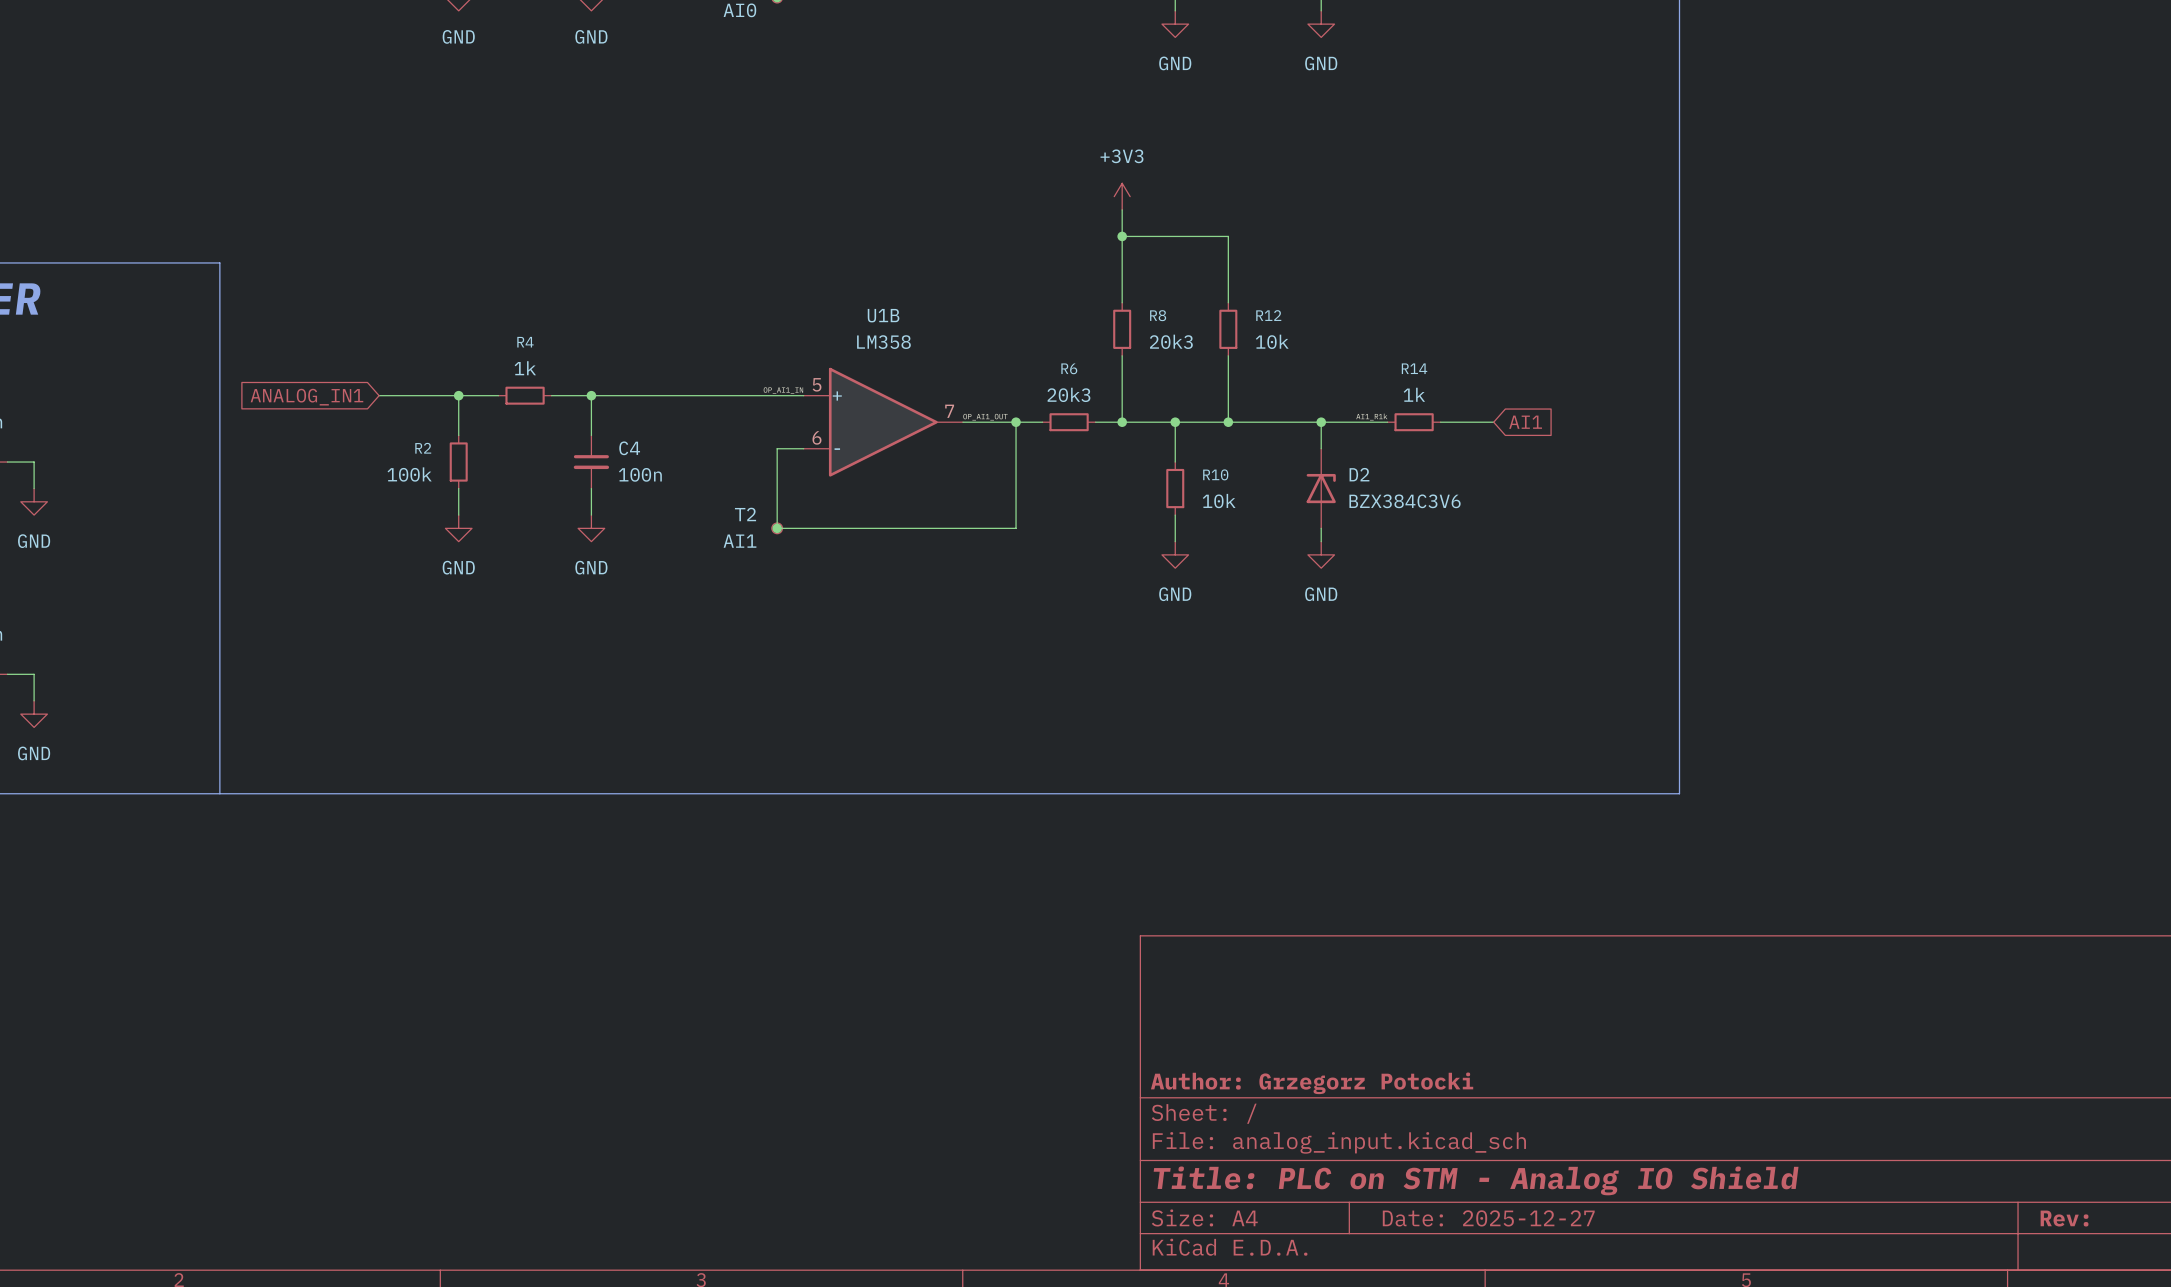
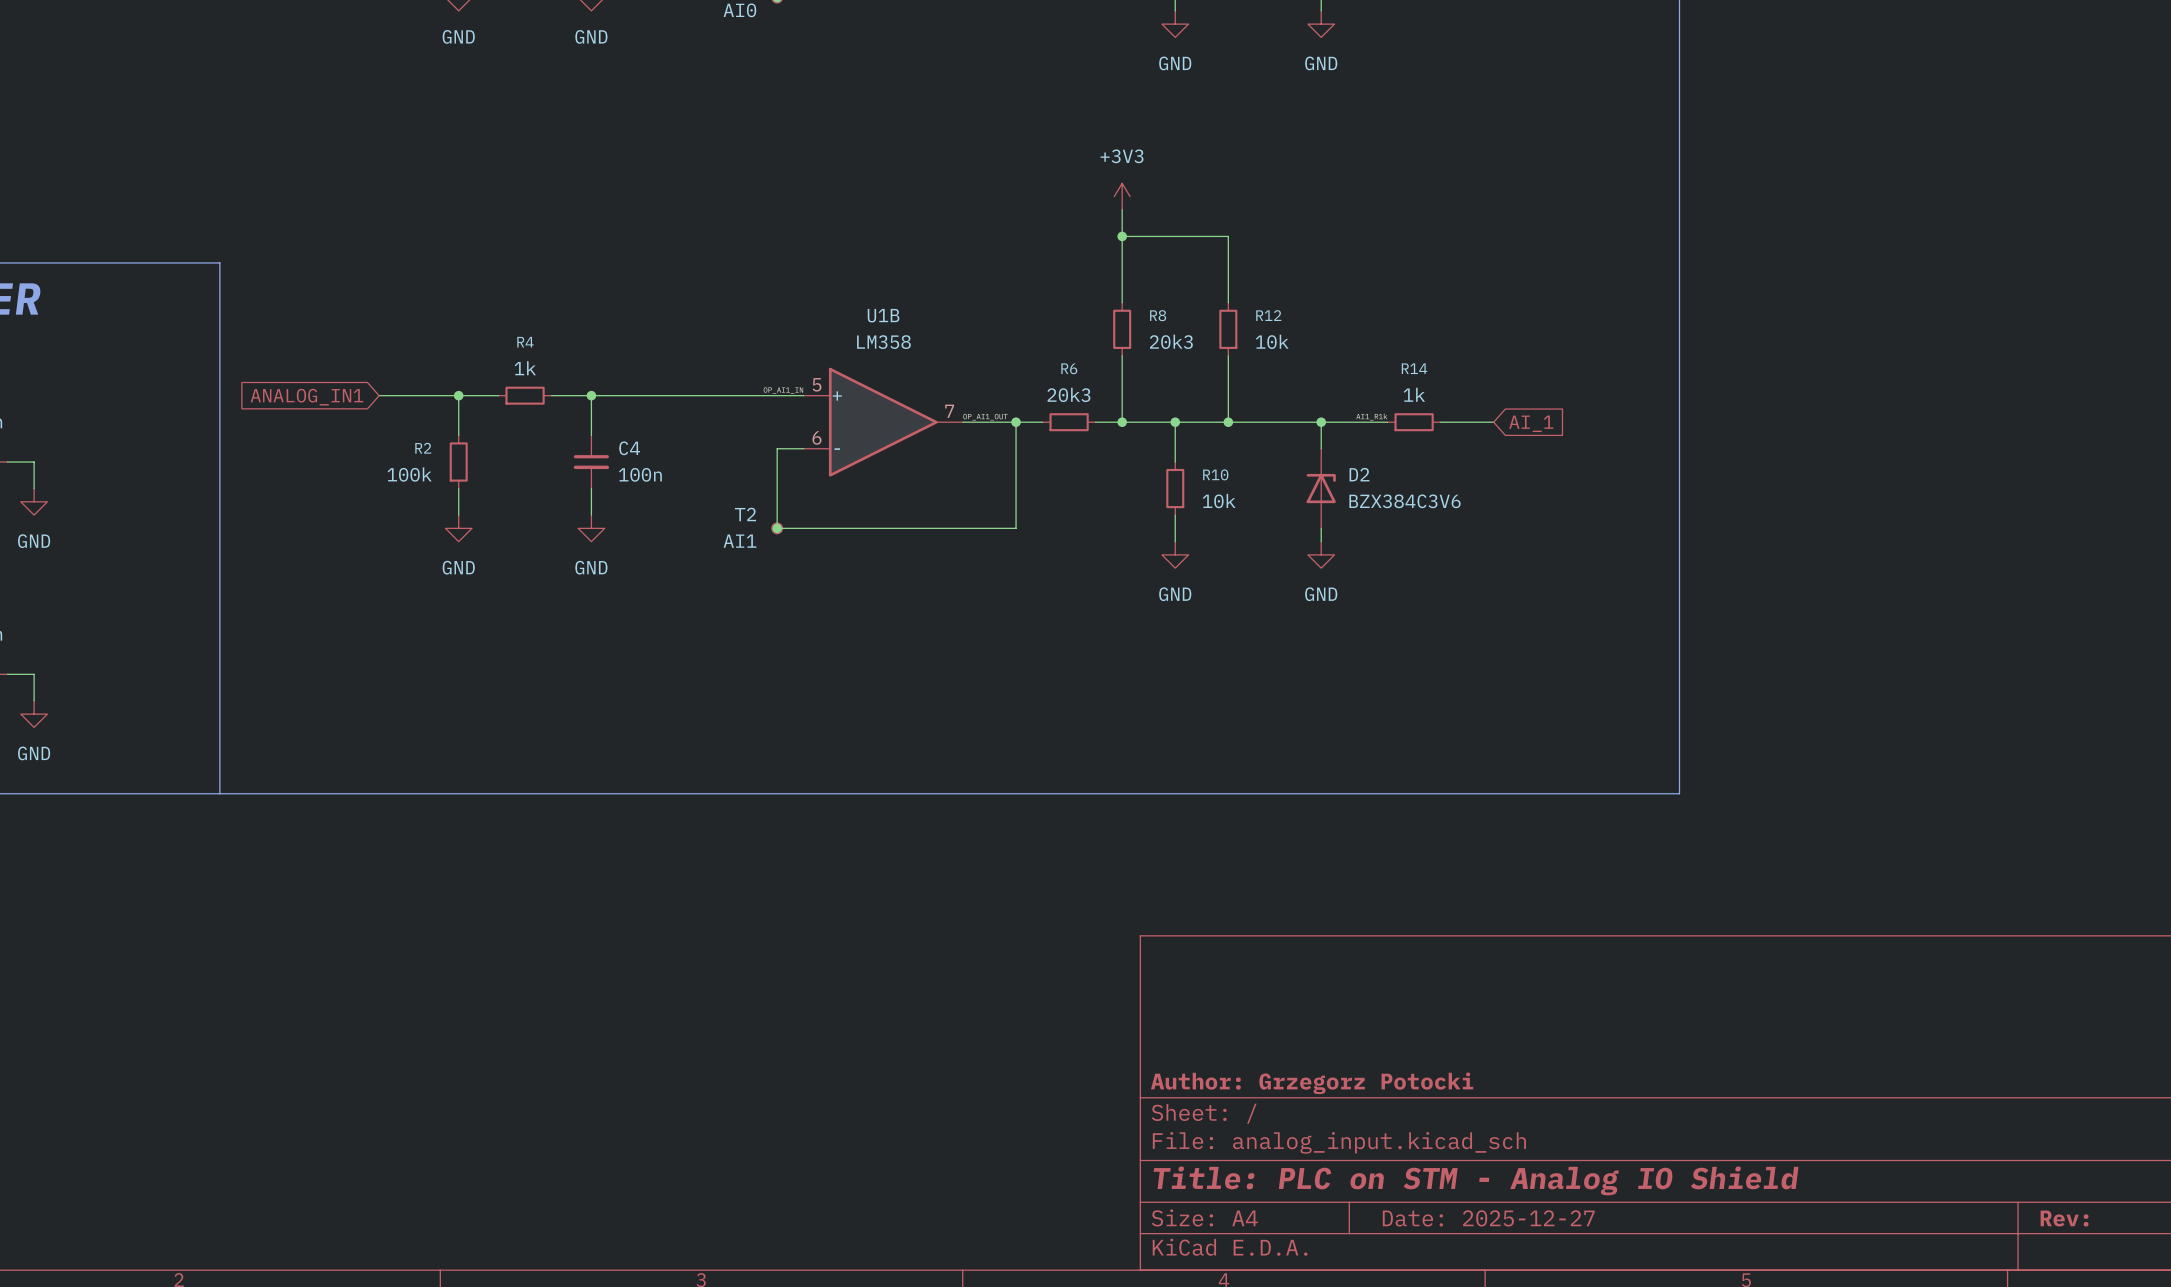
global label: AI1 (1525, 422) -> AI_1 (1531, 423)

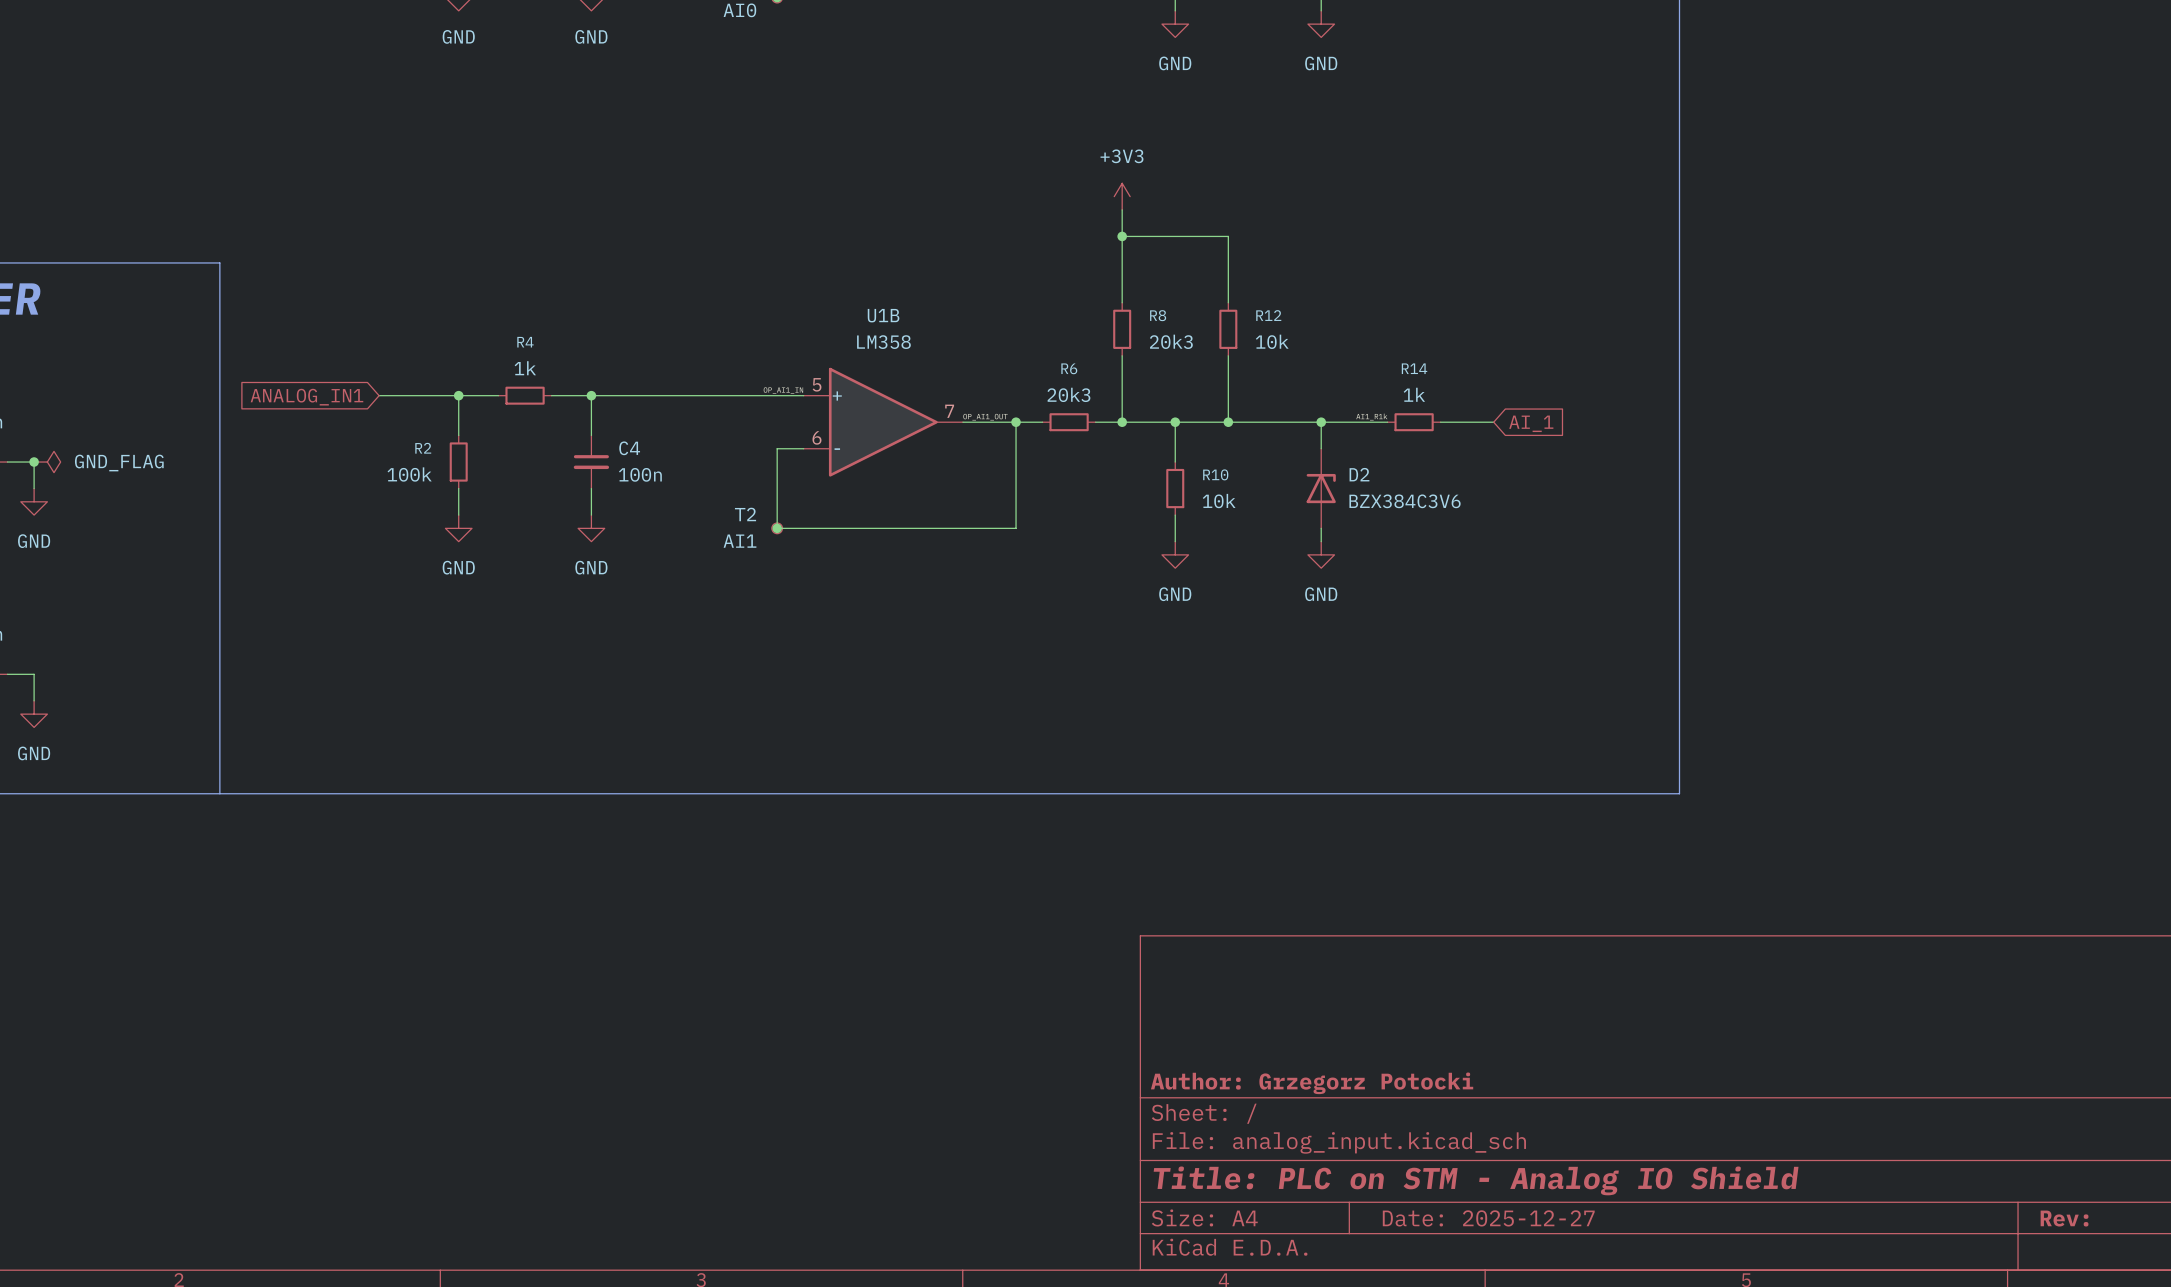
junction: none -> (34, 462)
power symbol: none -> GND_FLAG (47, 462)

